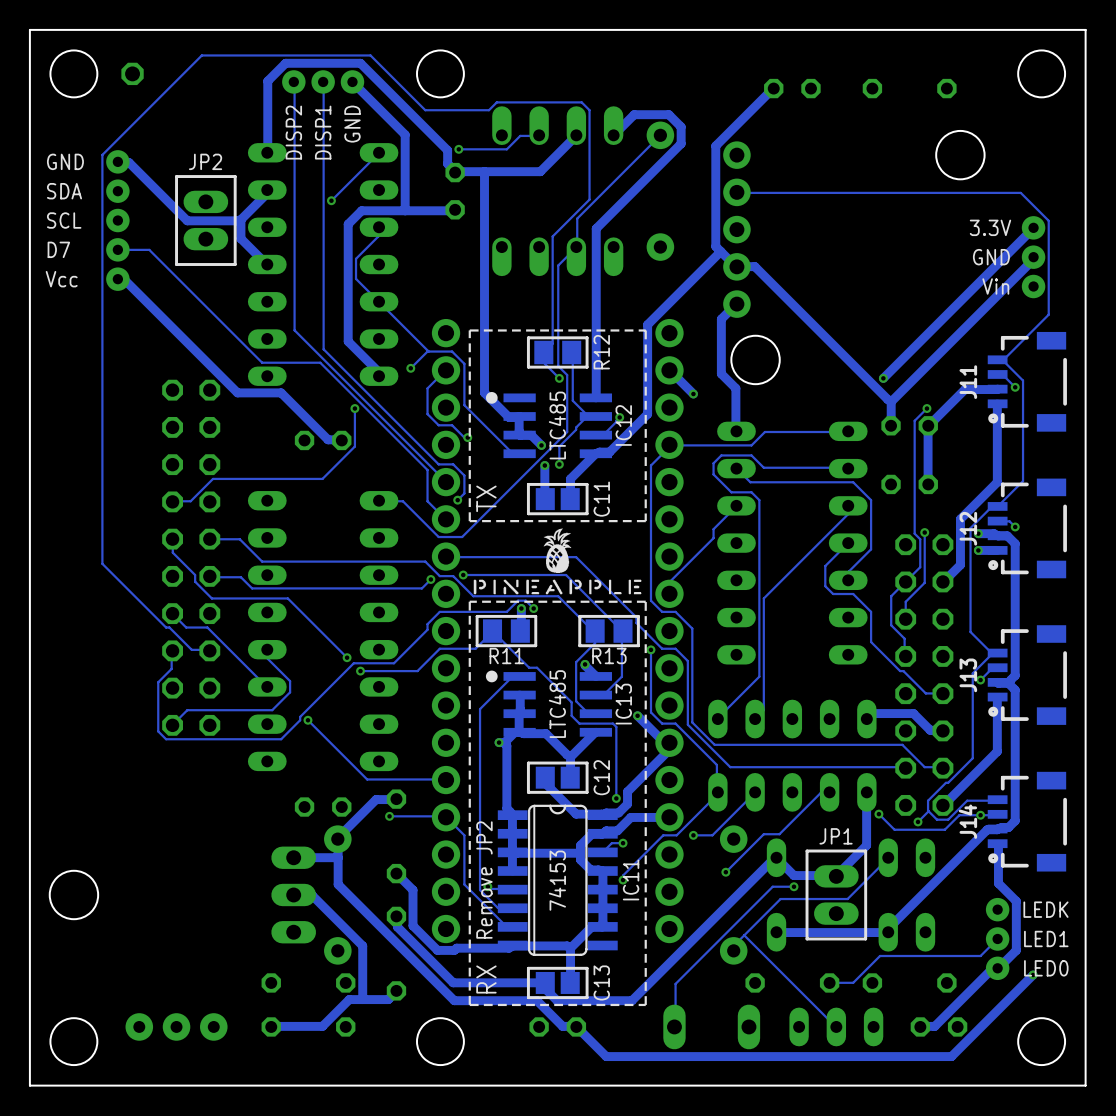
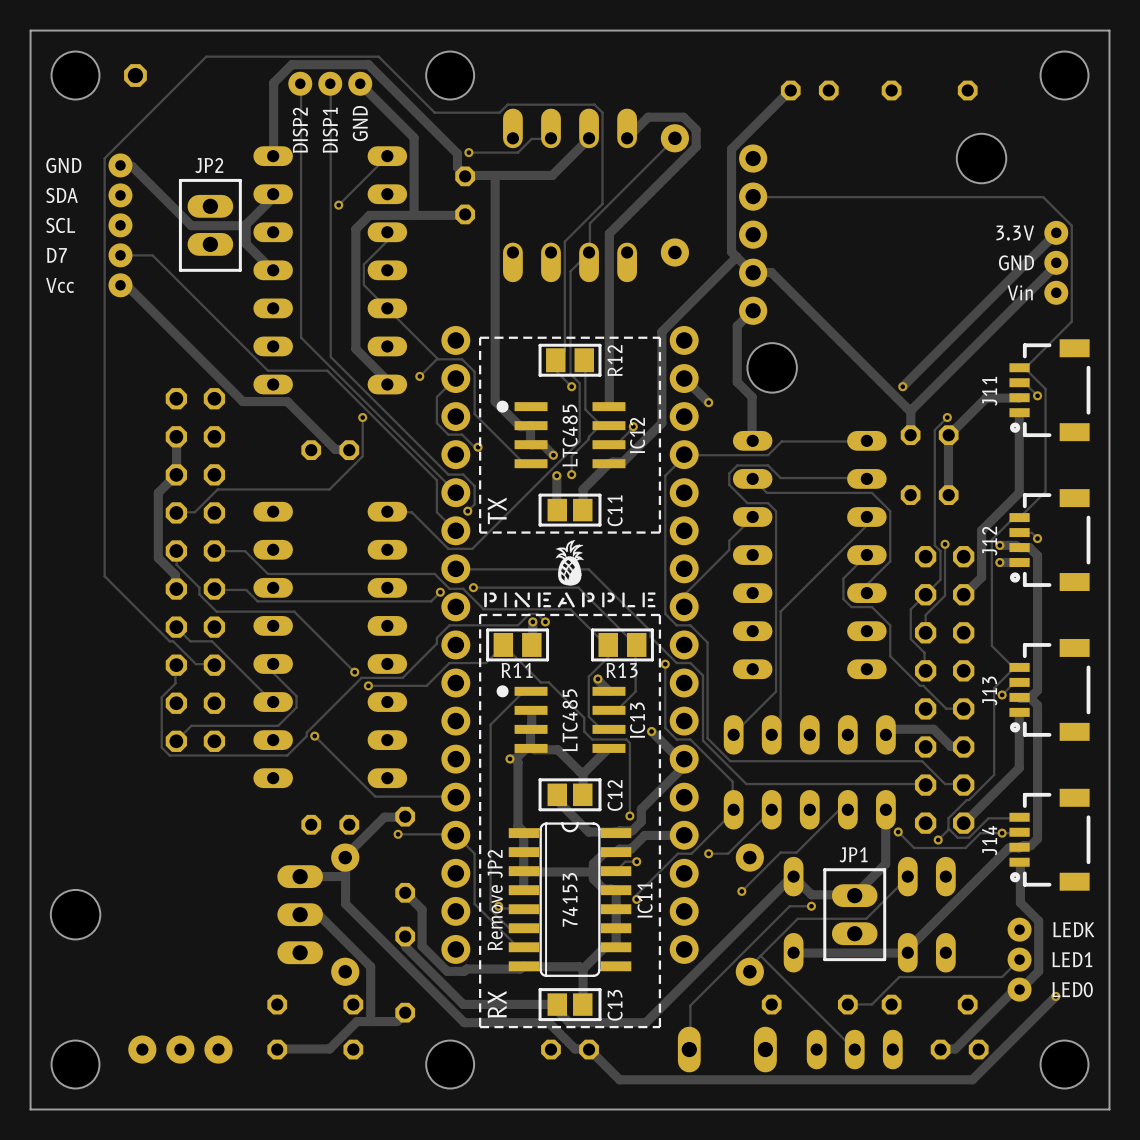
track: none -> (176, 436) (176, 474) (158, 492) (158, 557) (175, 575) (176, 589)

